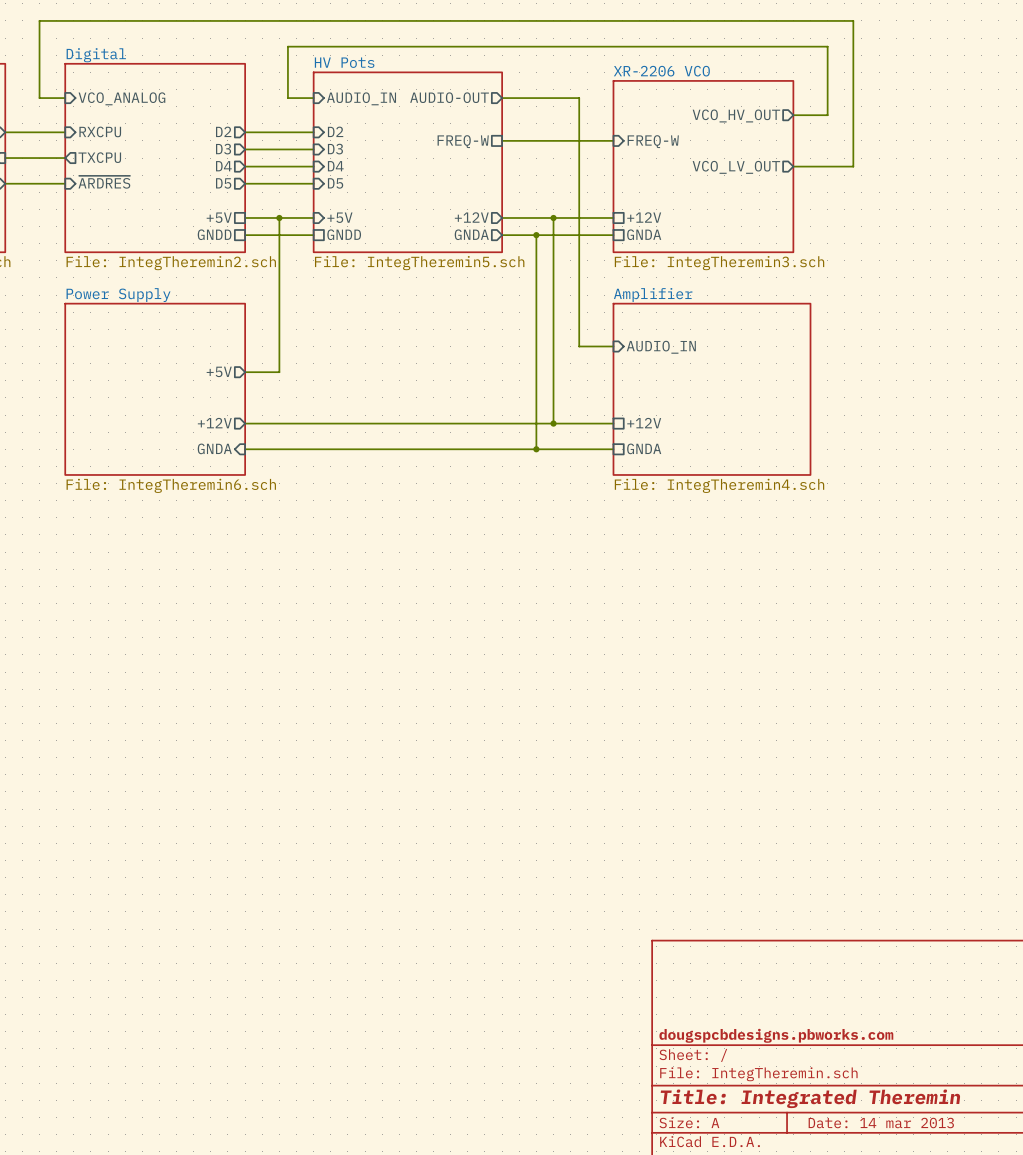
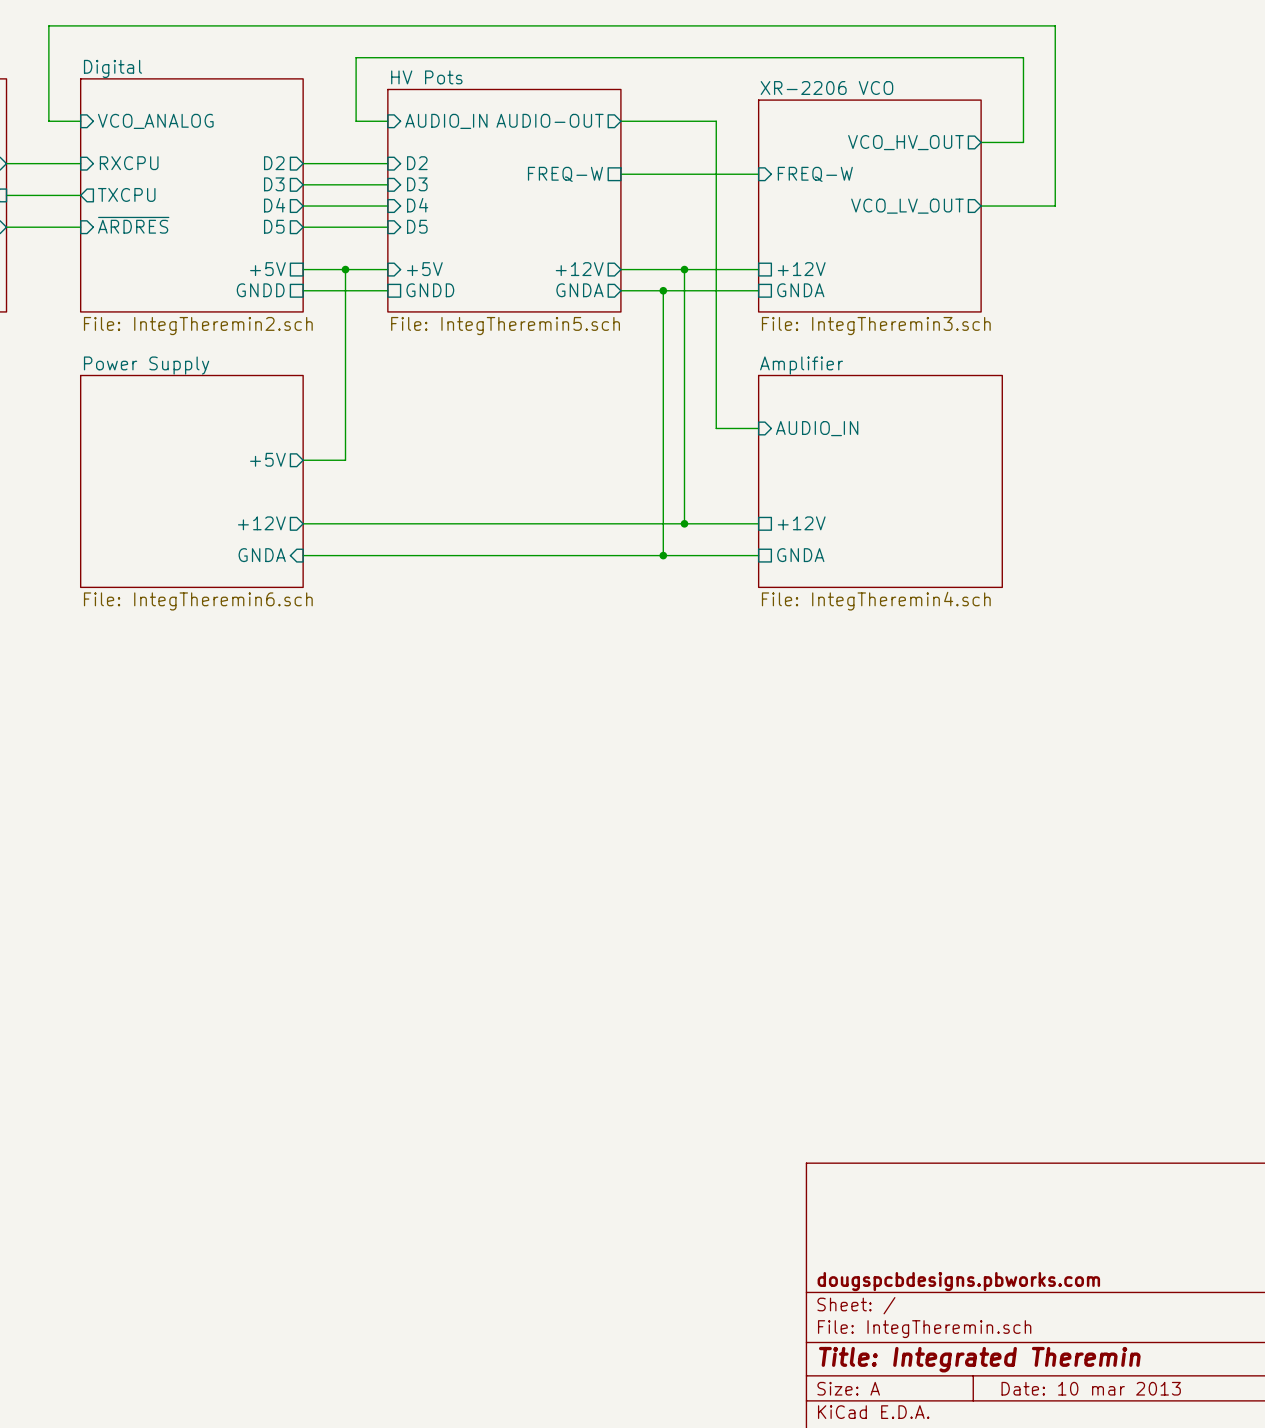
title block: Date: 14 mar 2013 (881, 1123) -> Date: 10 mar 2013 (1091, 1388)

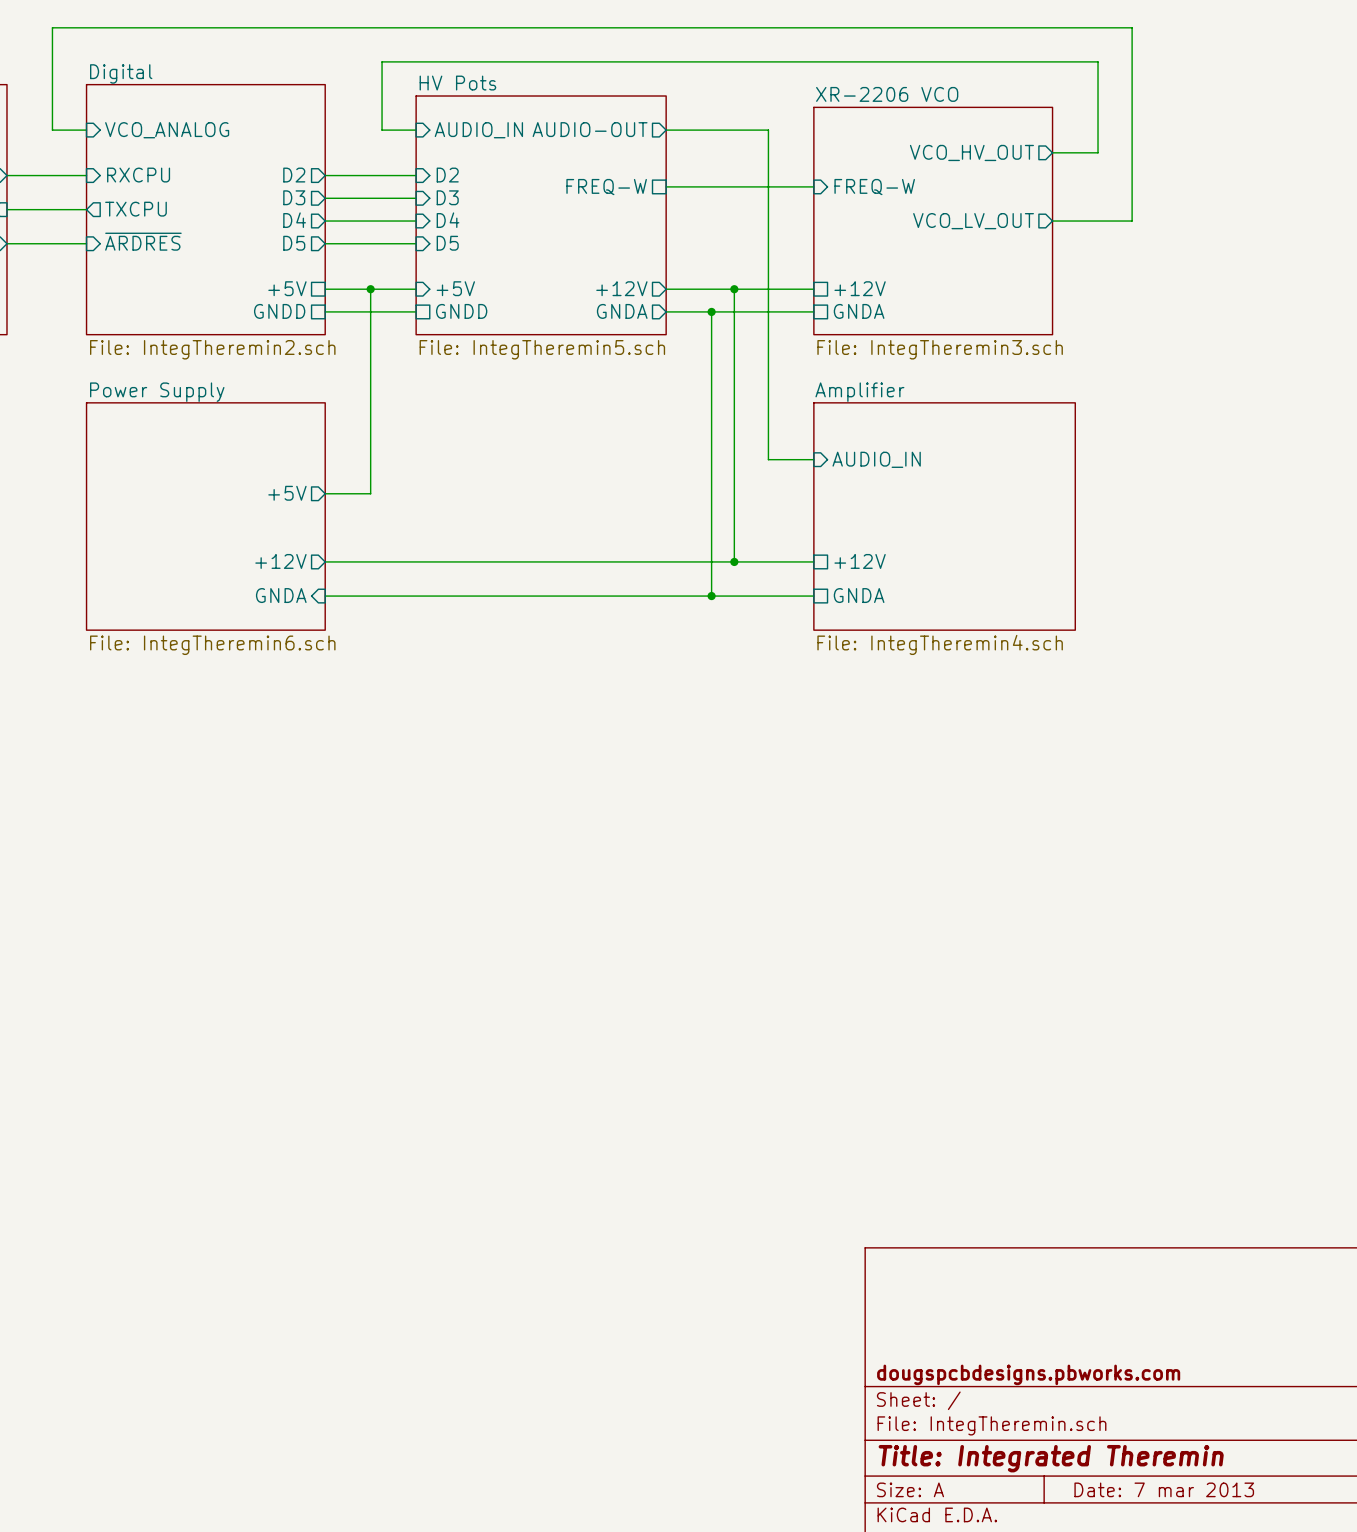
title block: Date: 10 mar 2013 (1091, 1388) -> Date: 7 mar 2013 (1164, 1489)

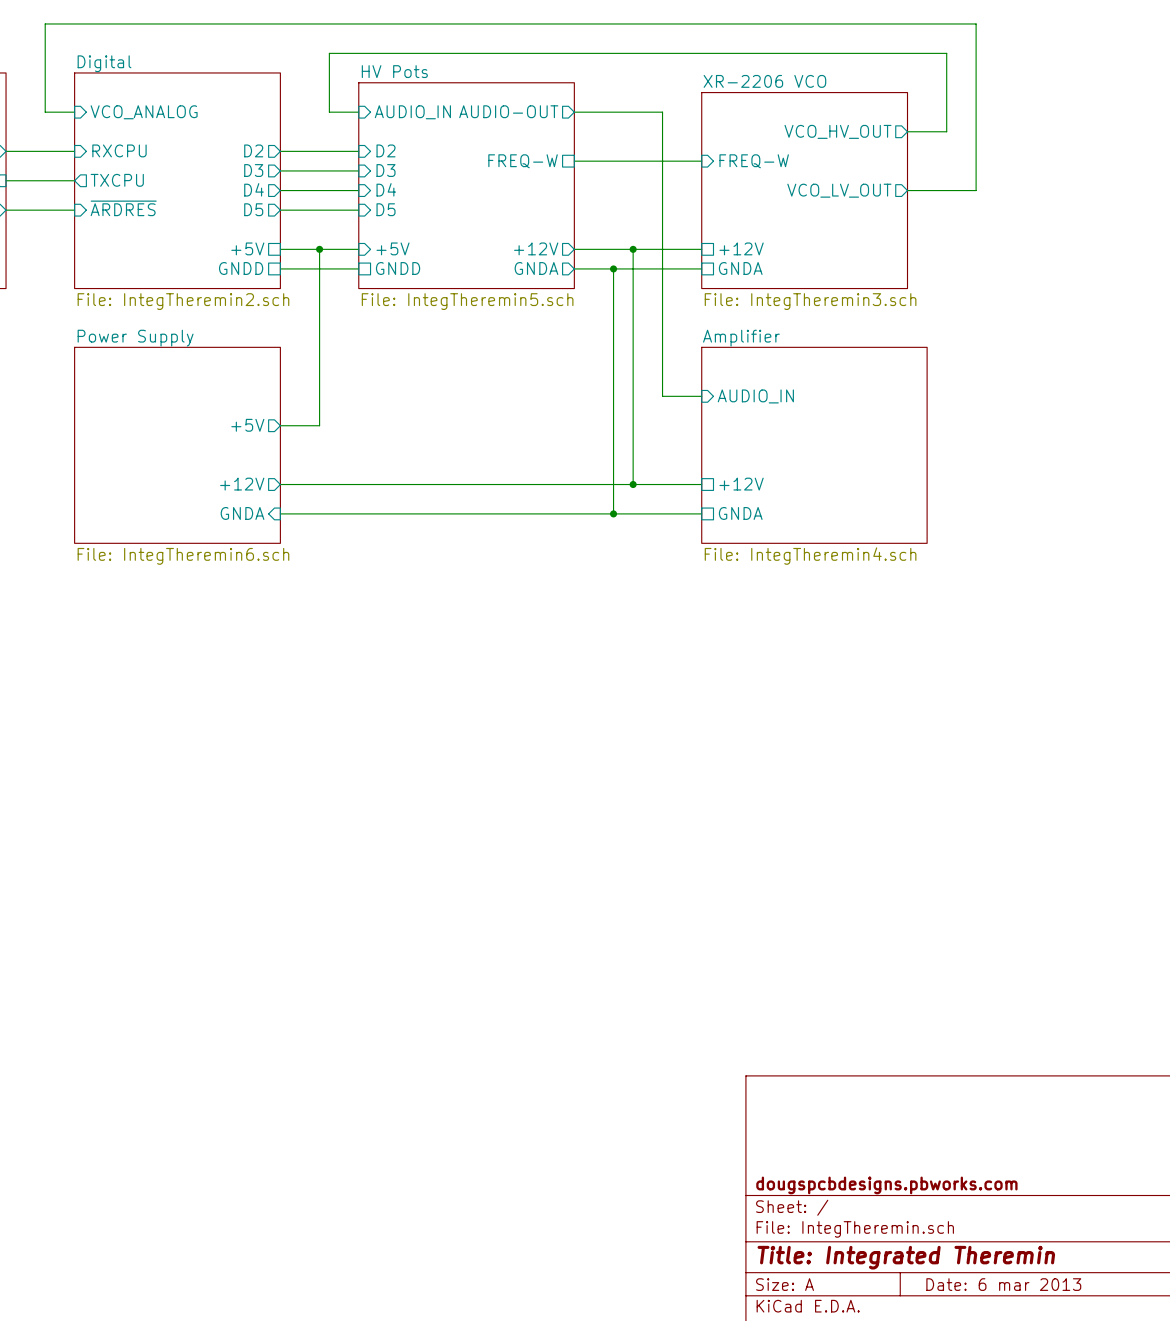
title block: Date: 7 mar 2013 (1164, 1489) -> Date: 6 mar 2013 (1003, 1284)

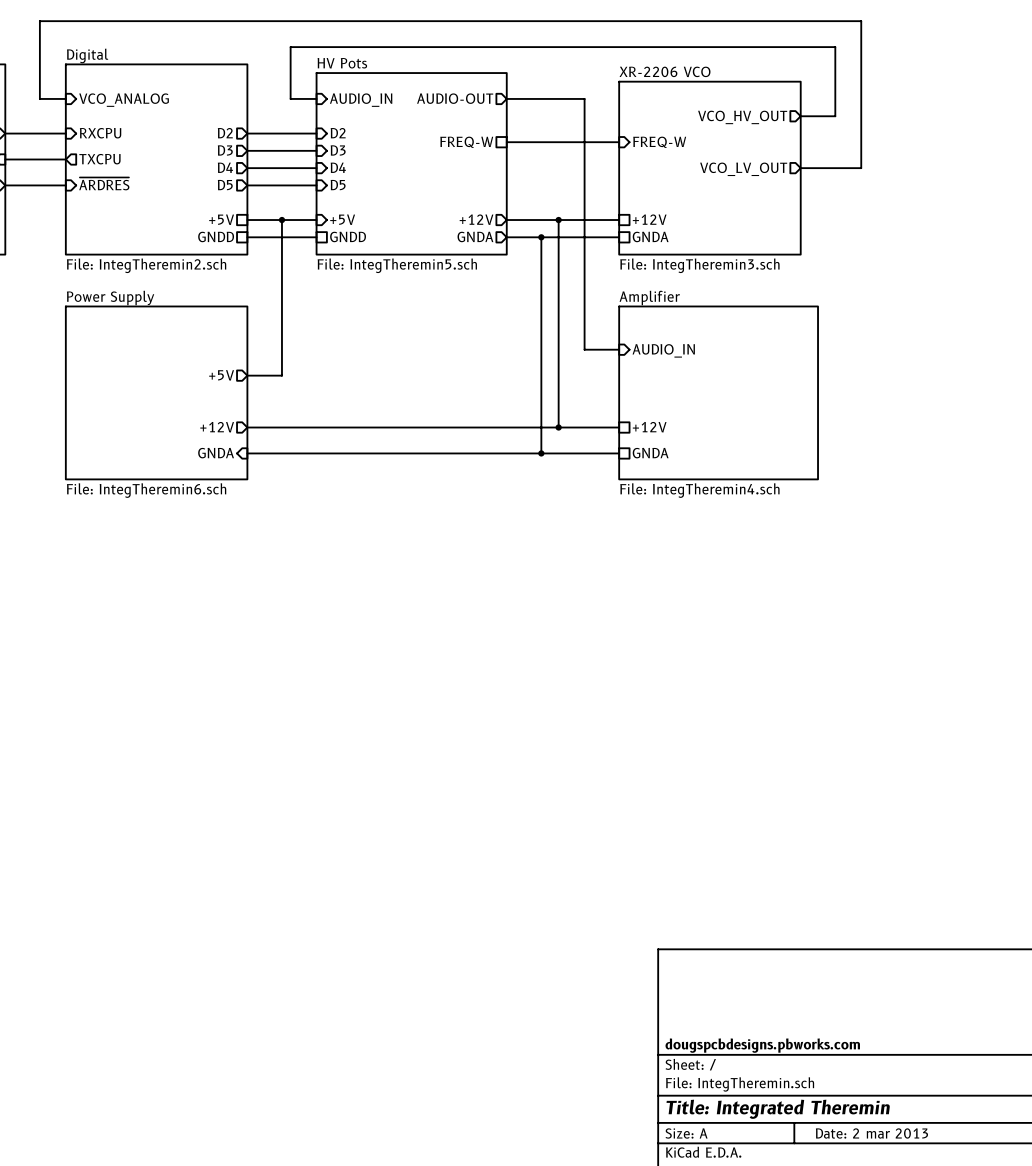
title block: Date: 6 mar 2013 (1003, 1284) -> Date: 2 mar 2013 (871, 1133)

